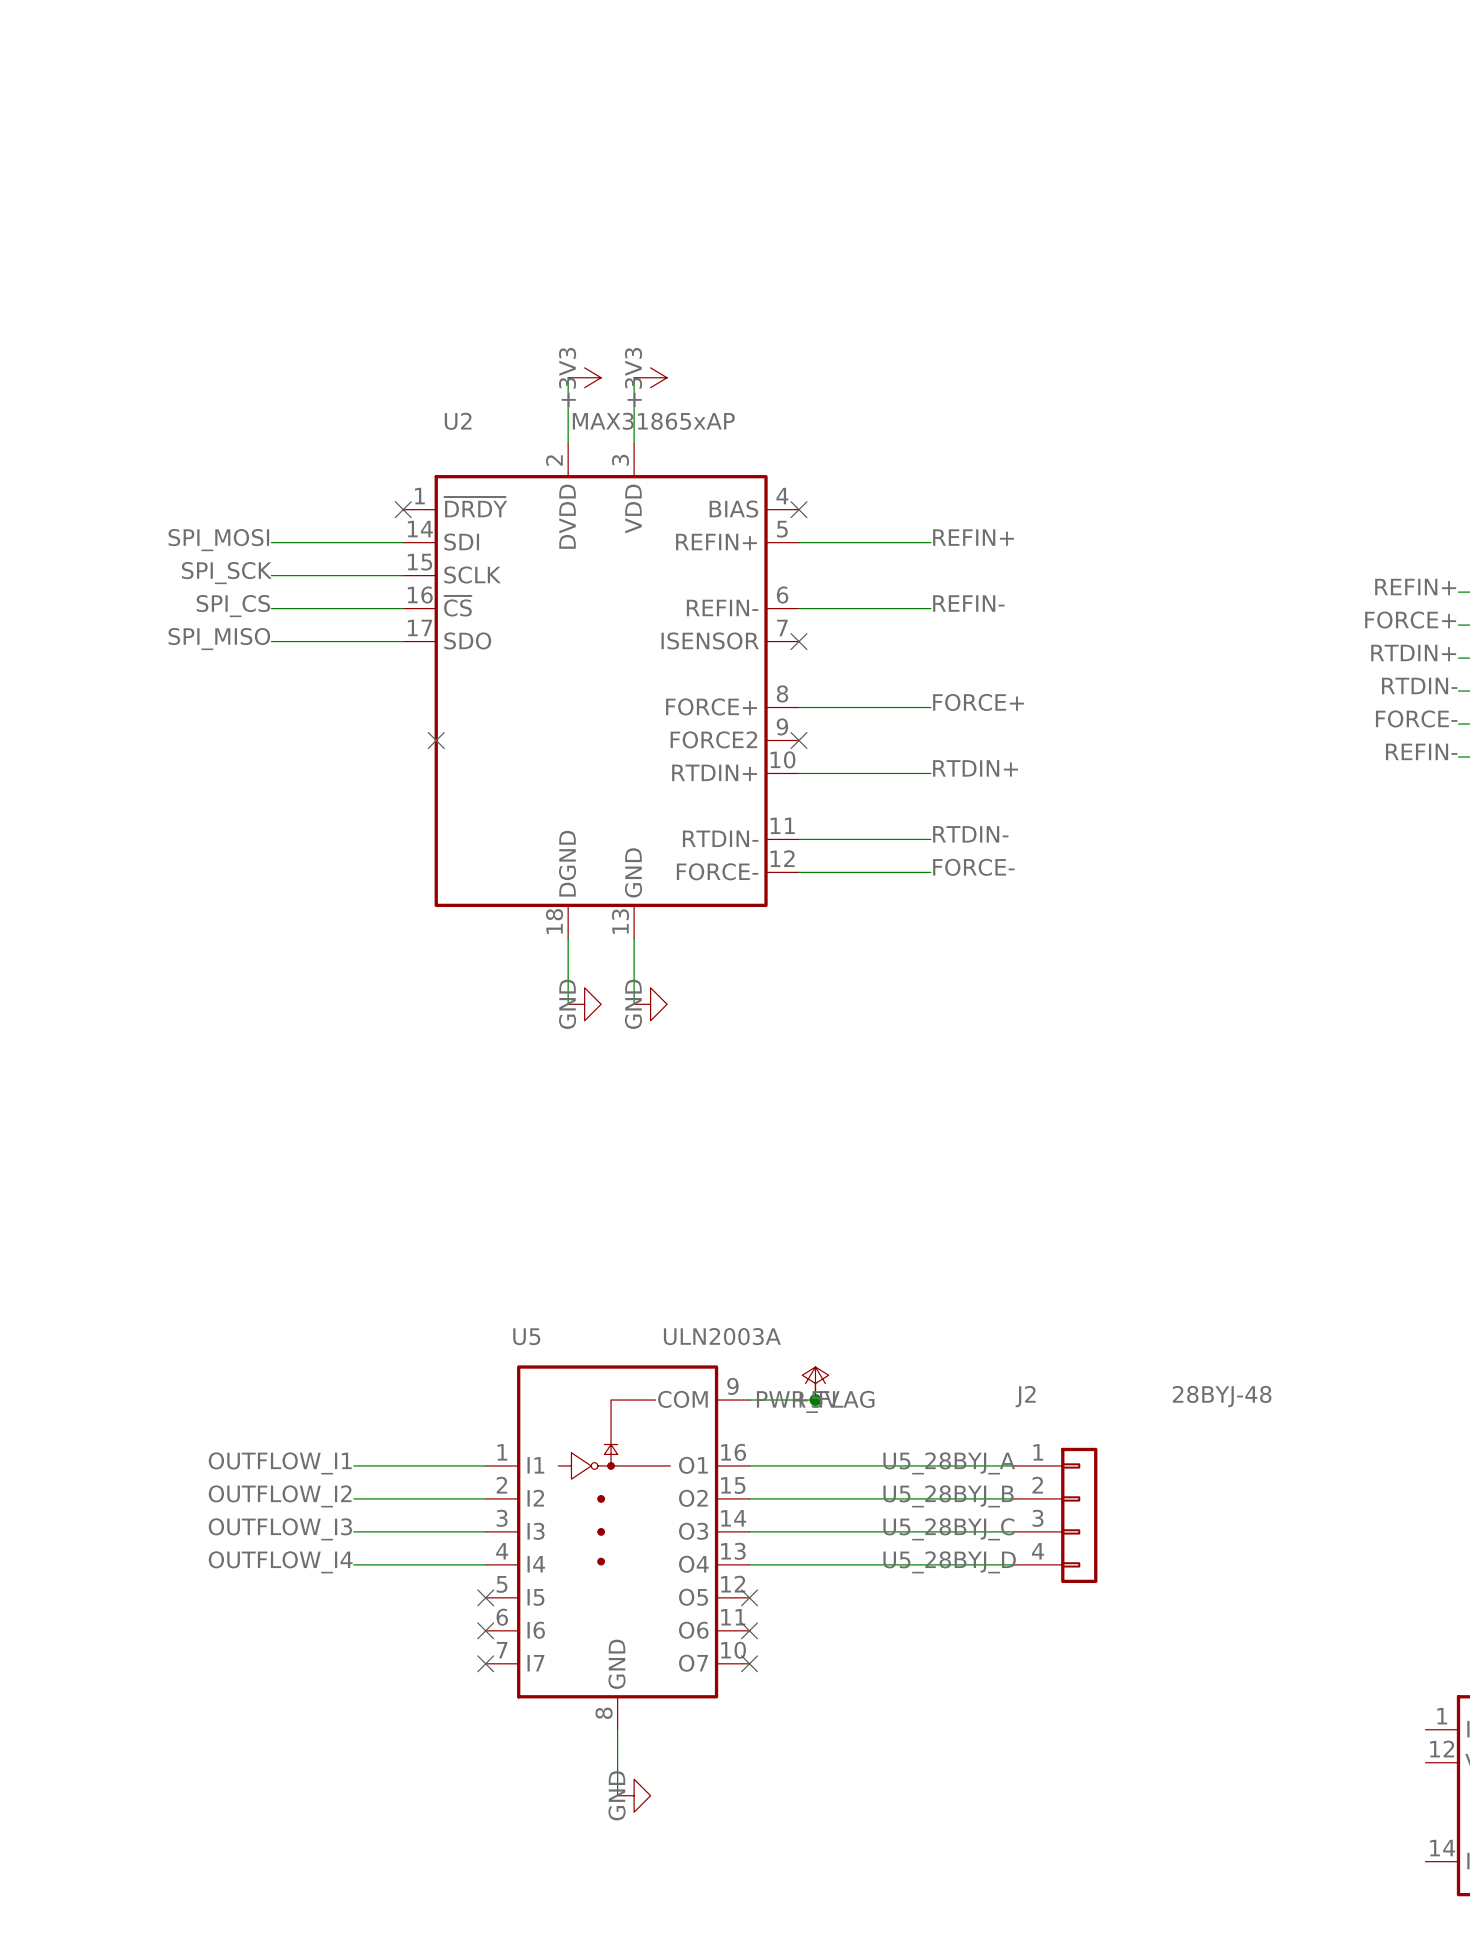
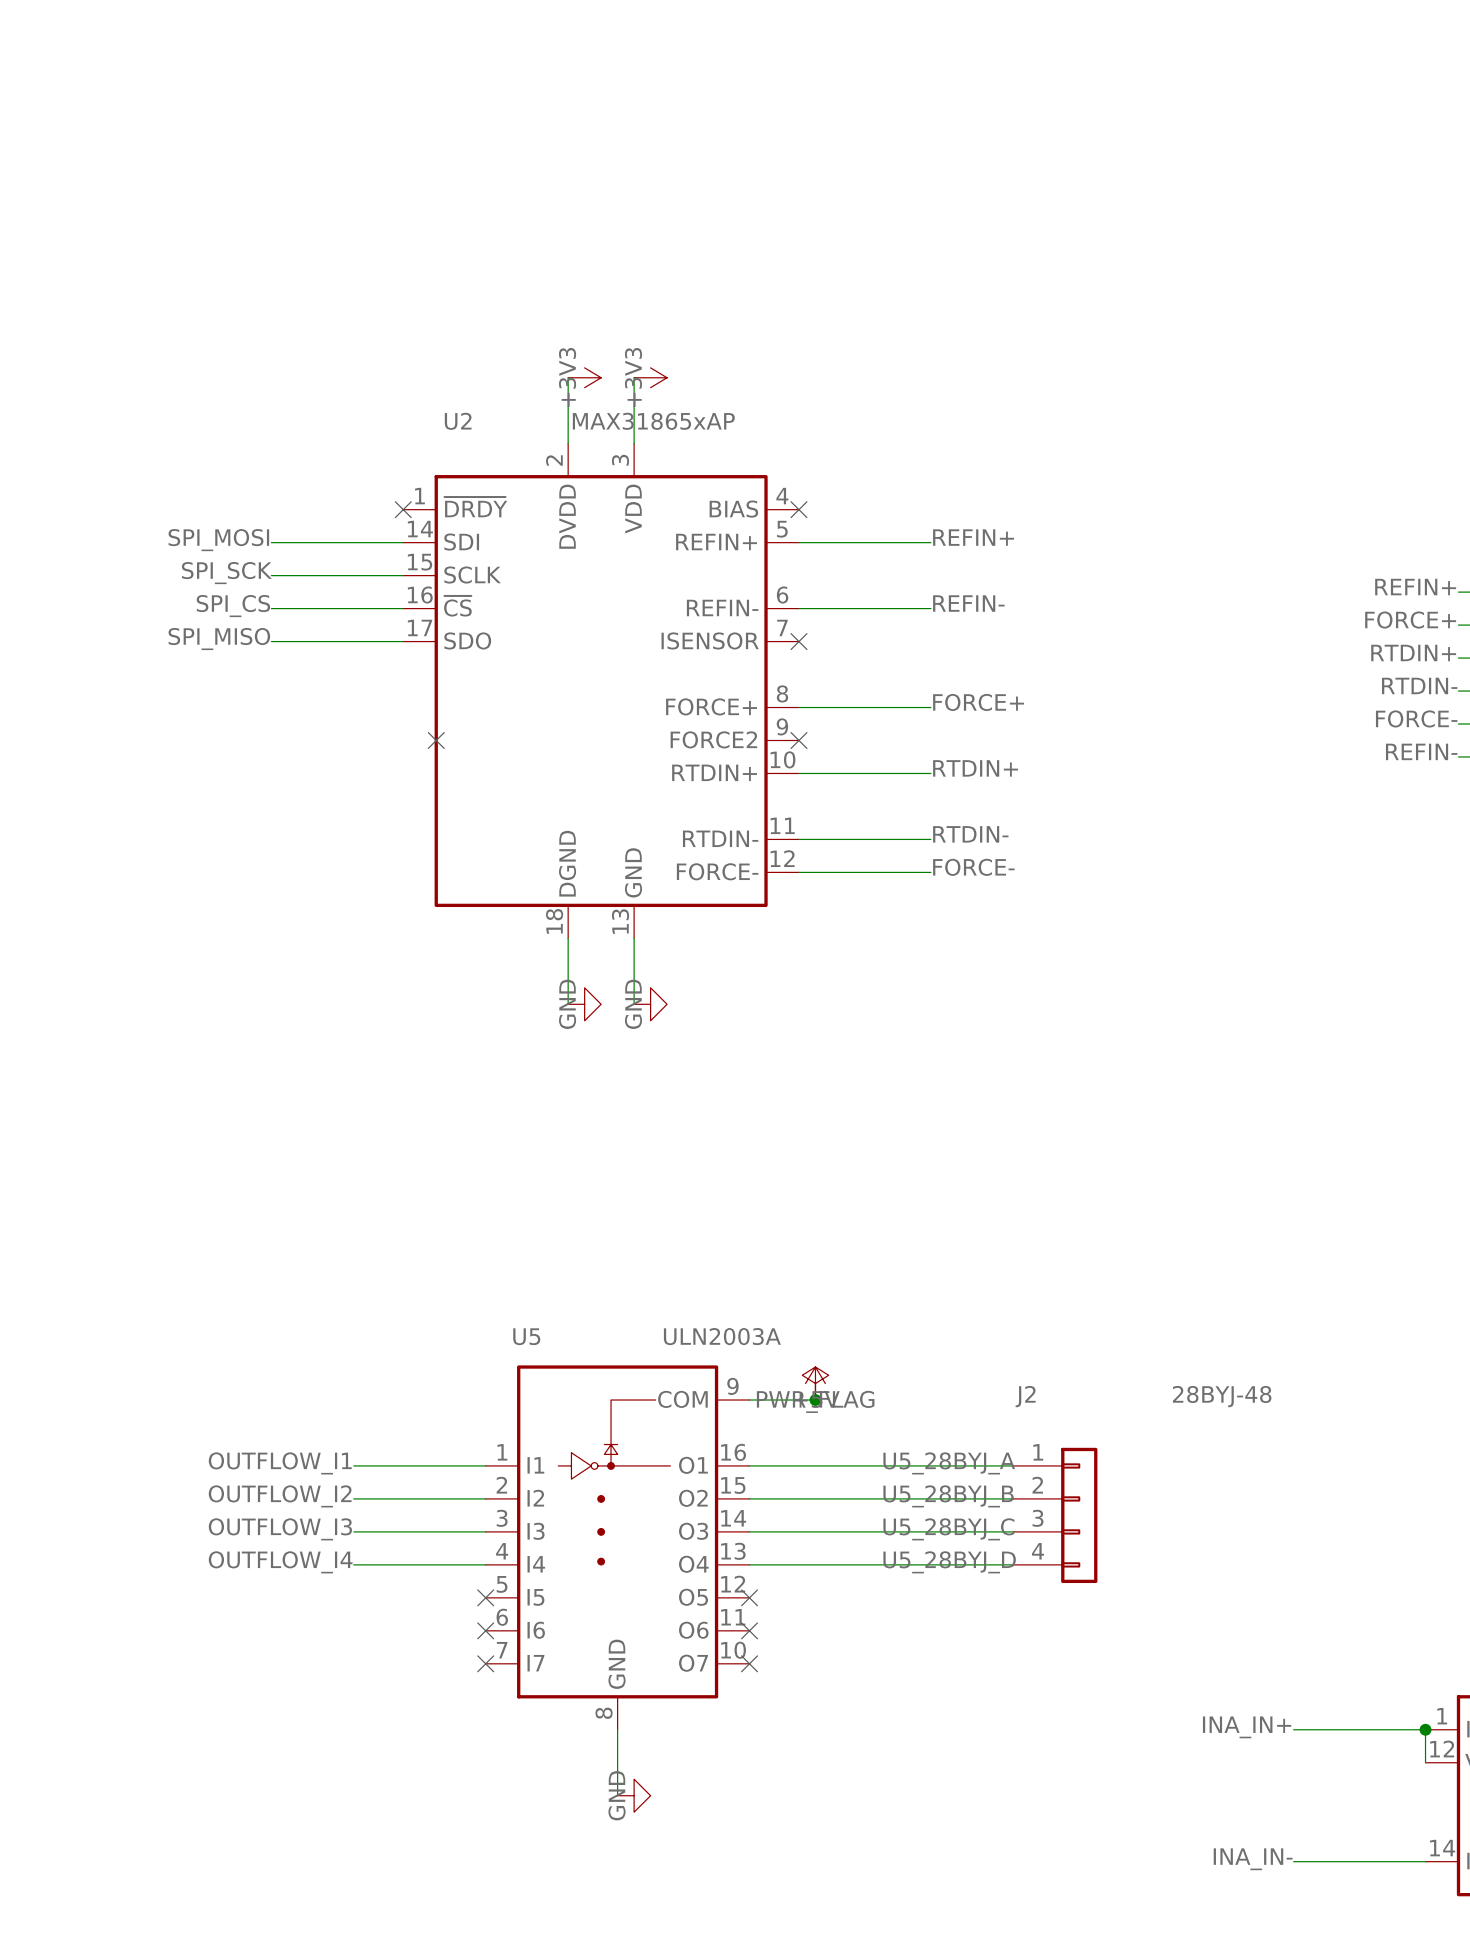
label: none -> INA_IN+ (1247, 1727)
wire: none -> (1293, 1729) (1425, 1729) (1425, 1762)
junction: none -> (1425, 1729)
label: none -> INA_IN- (1253, 1859)
wire: none -> (1293, 1861) (1425, 1861)

